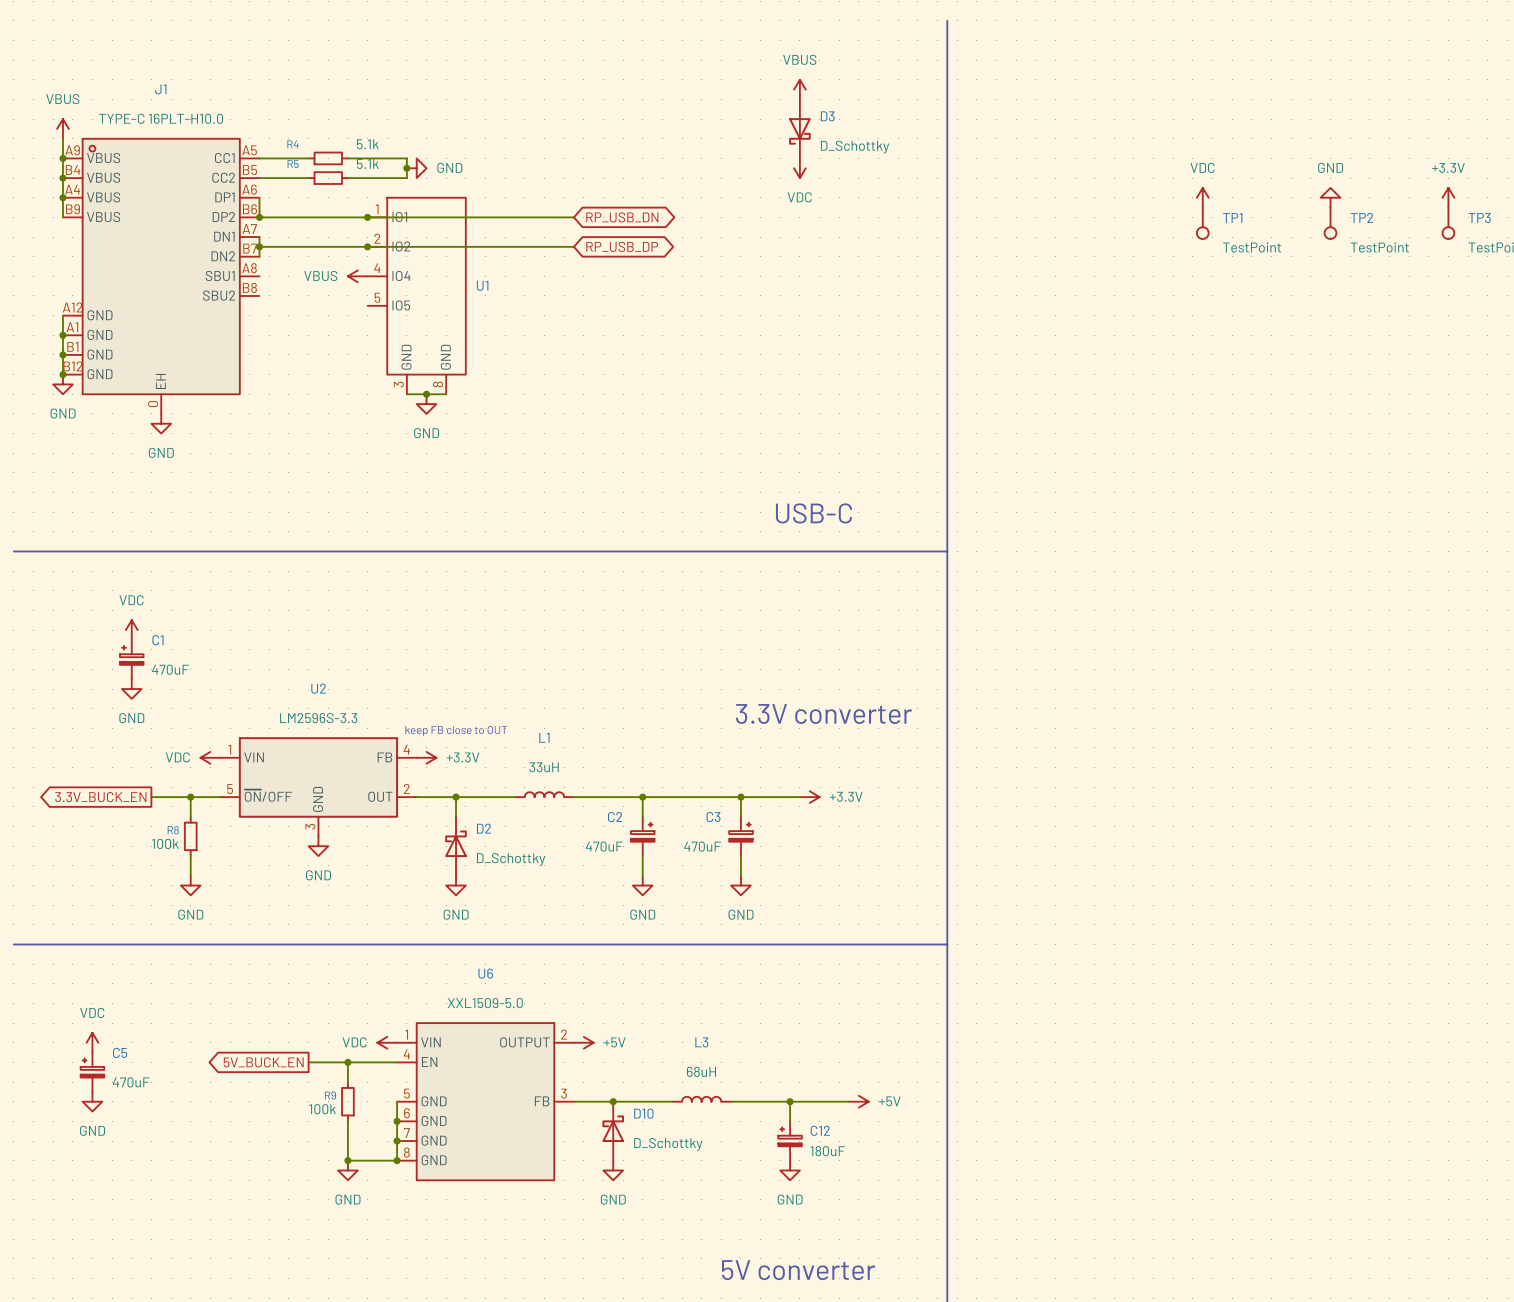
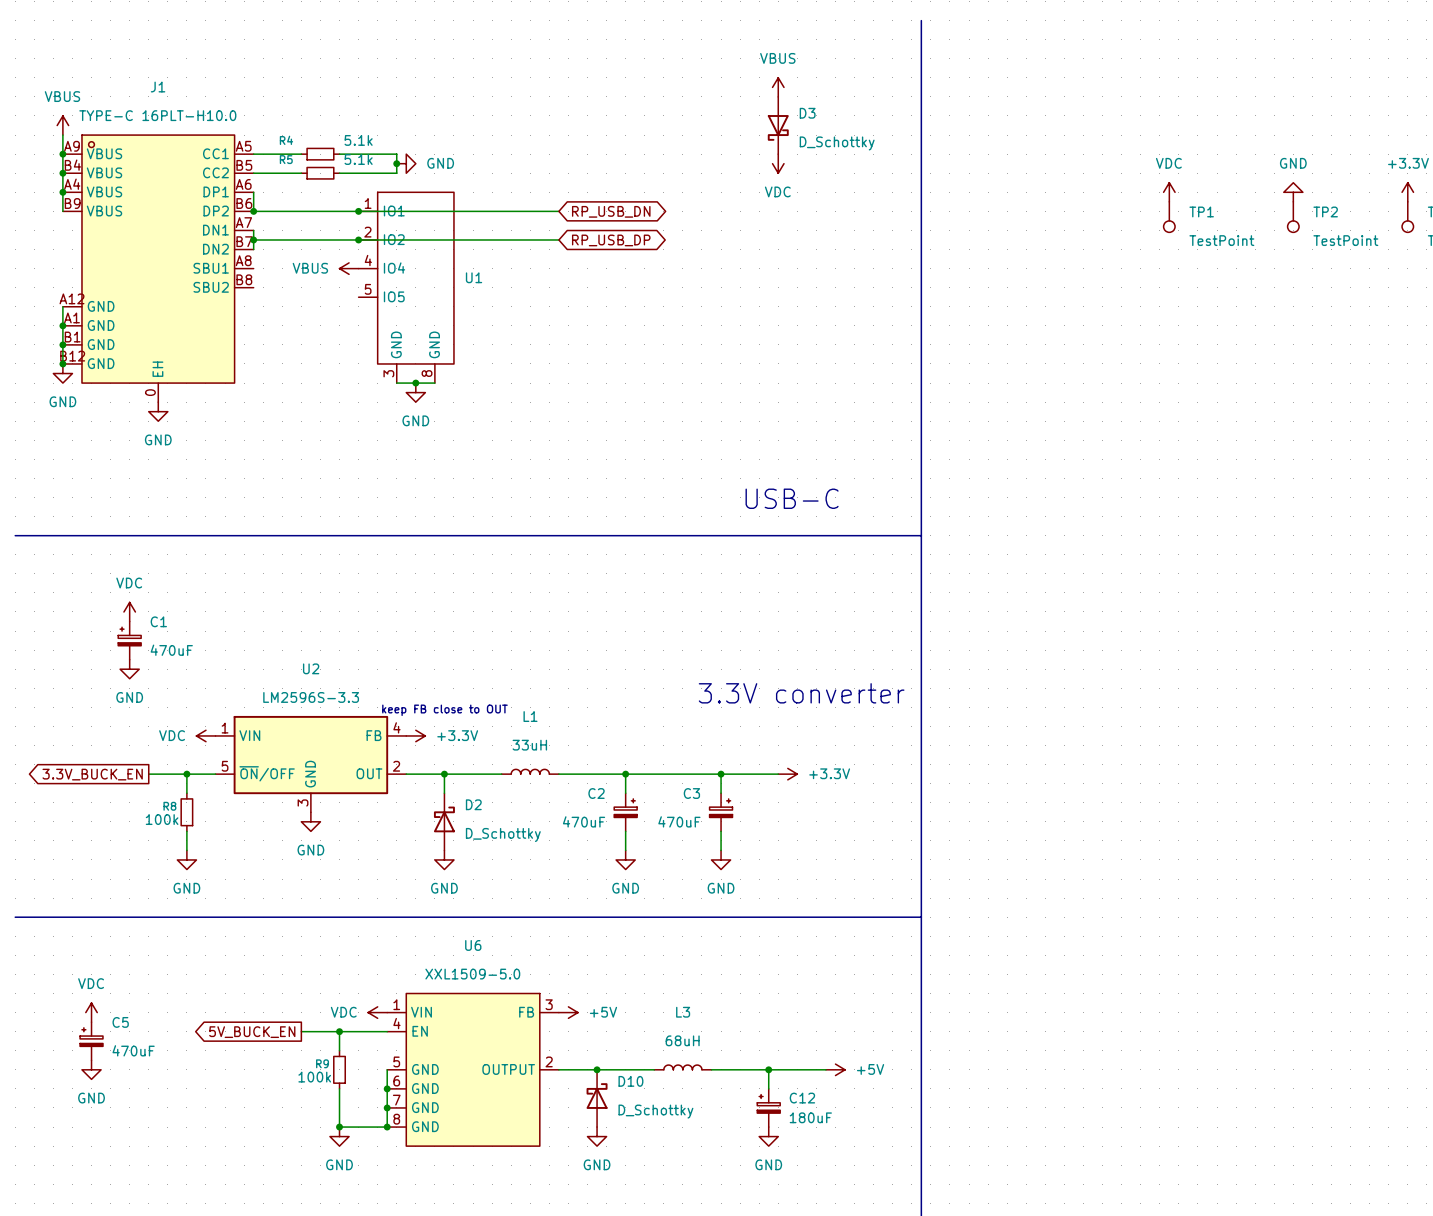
U6 pin number: 2 (564, 1034) -> 3 (549, 1004)
U6 pin name: OUTPUT (524, 1042) -> FB (526, 1012)
U6 pin number: 3 (563, 1093) -> 2 (549, 1061)
U6 pin name: FB (542, 1101) -> OUTPUT (508, 1069)

